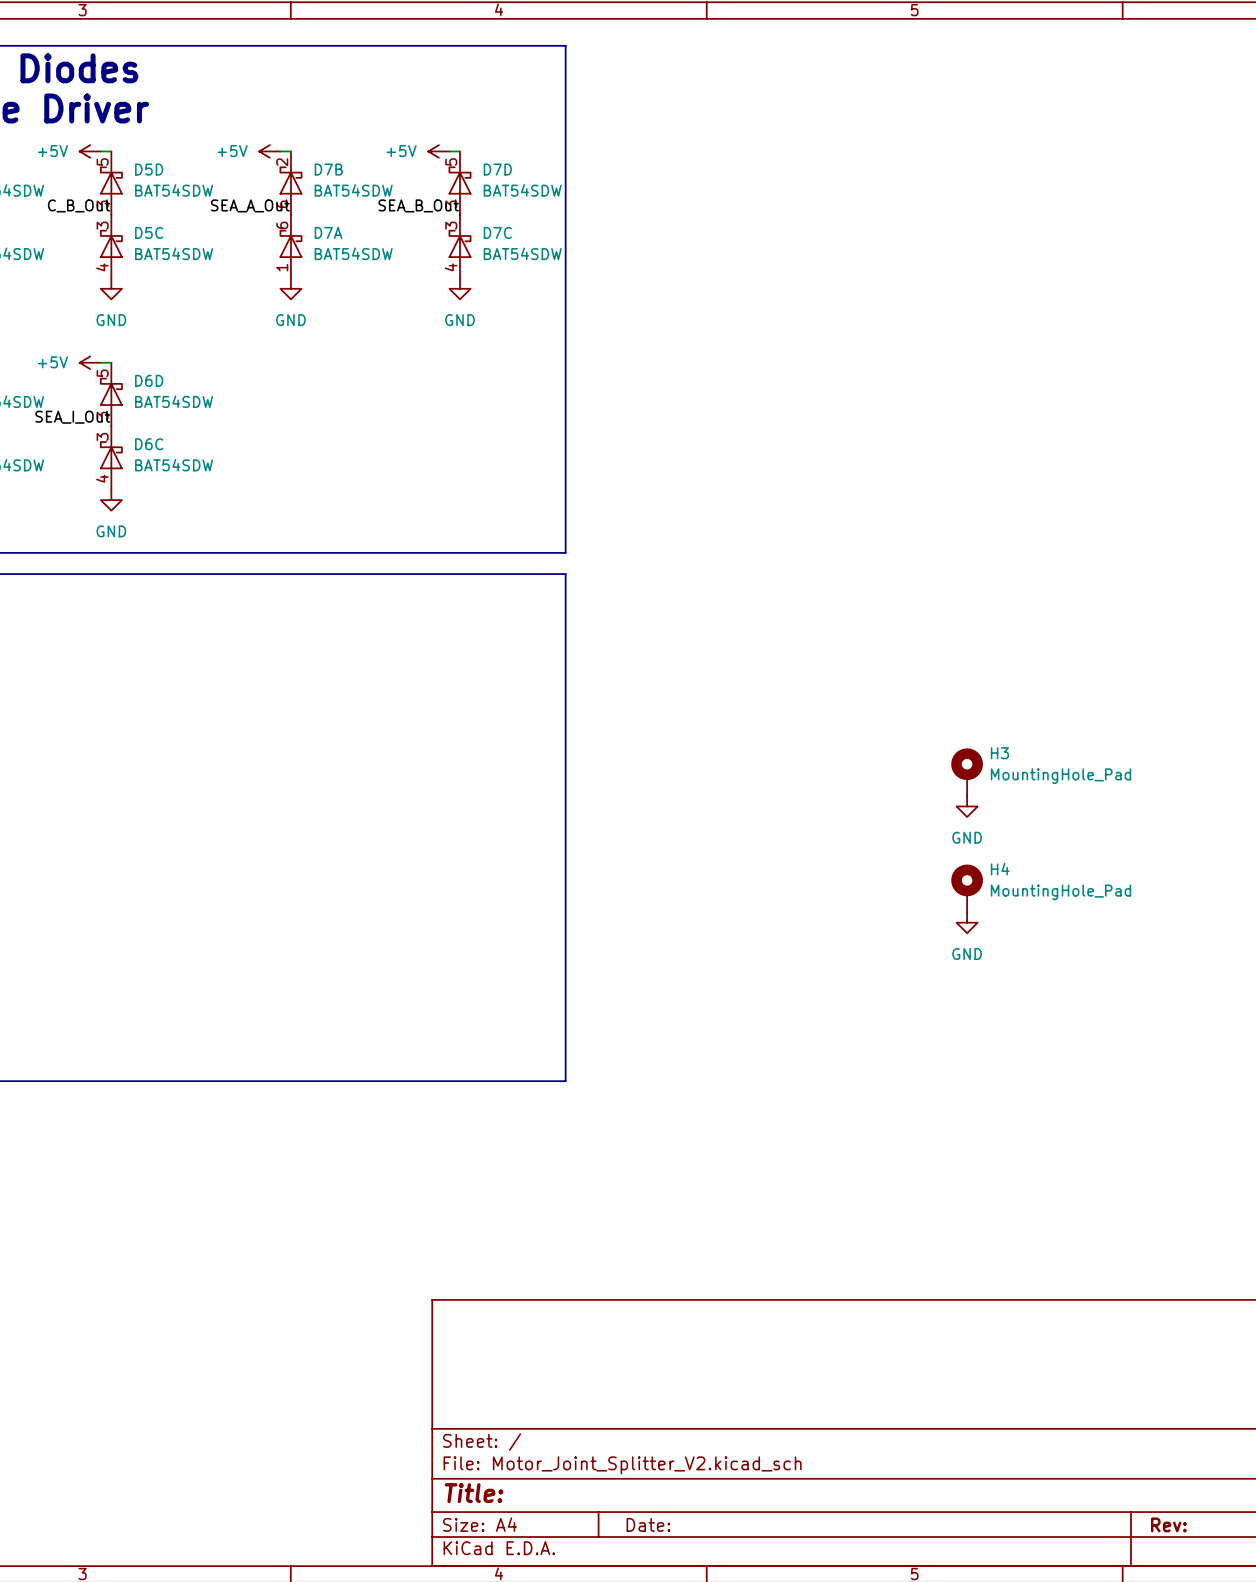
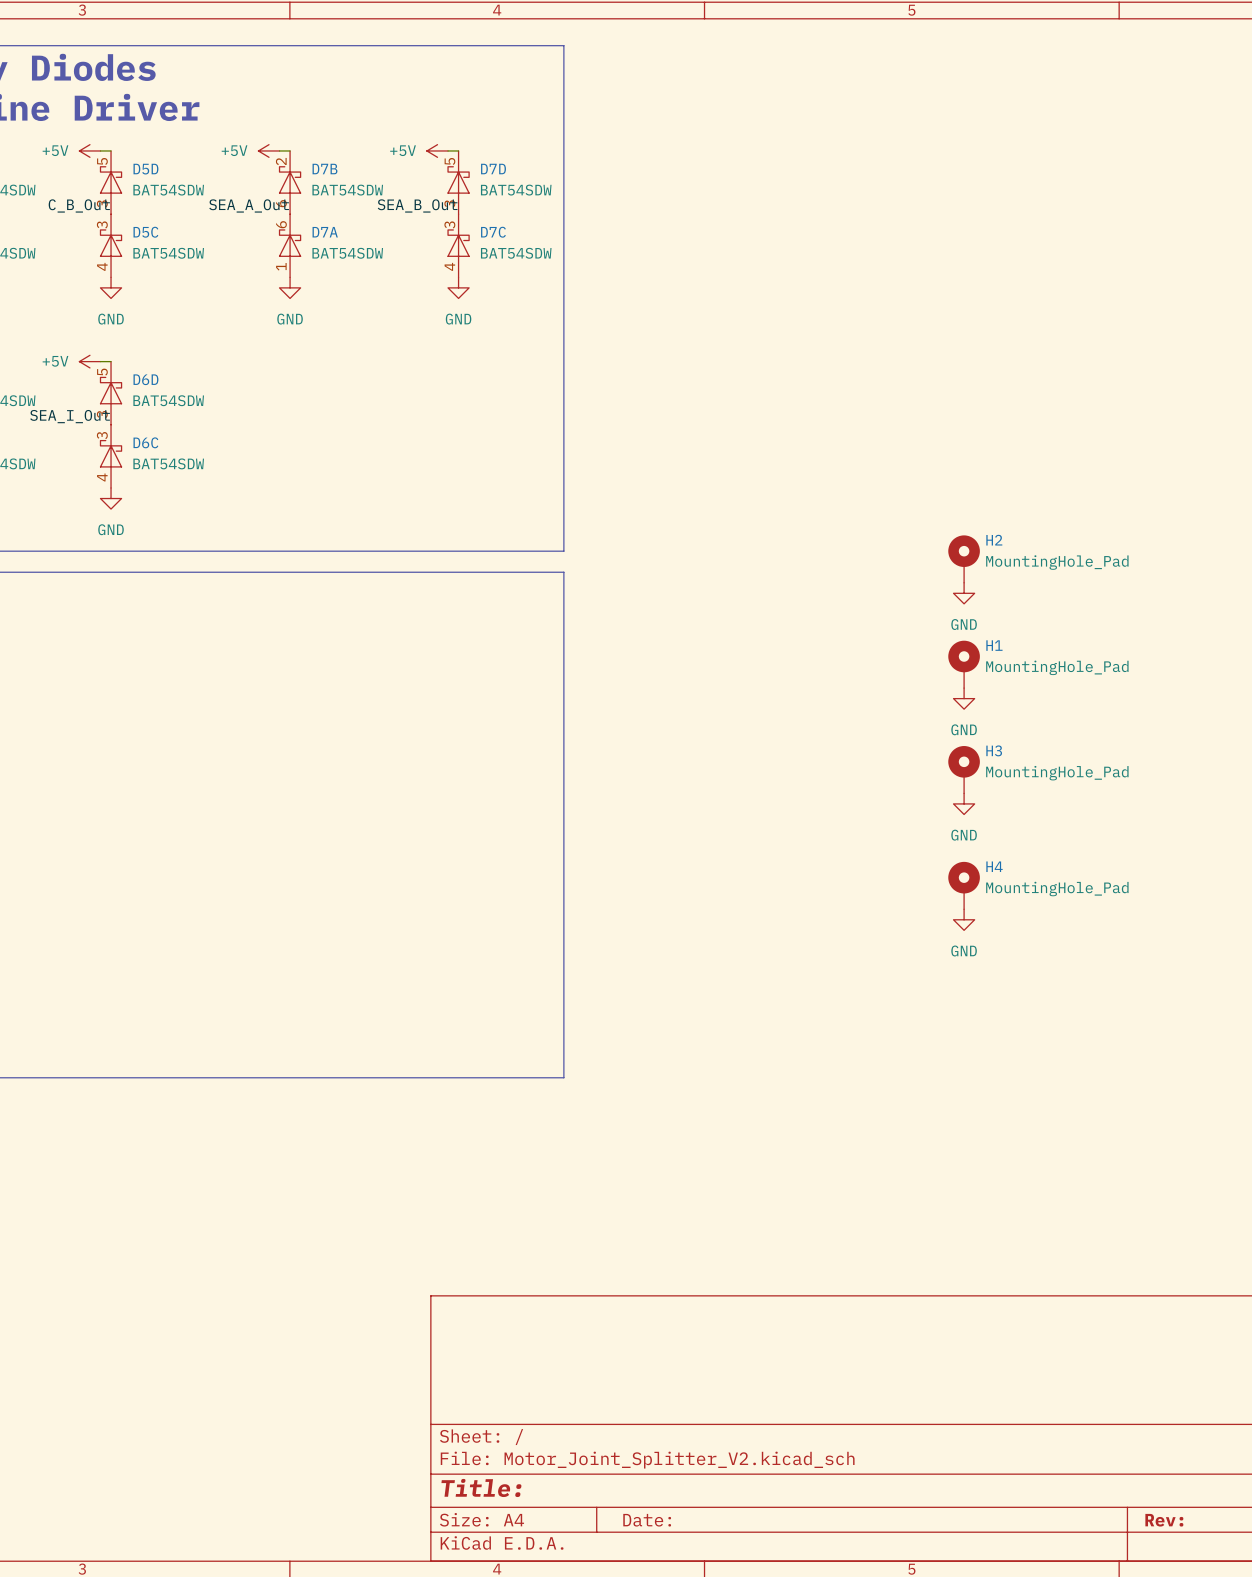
H2: none -> MountingHole_Pad (964, 559)
power symbol: none -> GND (964, 593)
H1: none -> MountingHole_Pad (964, 664)
power symbol: none -> GND (964, 698)

